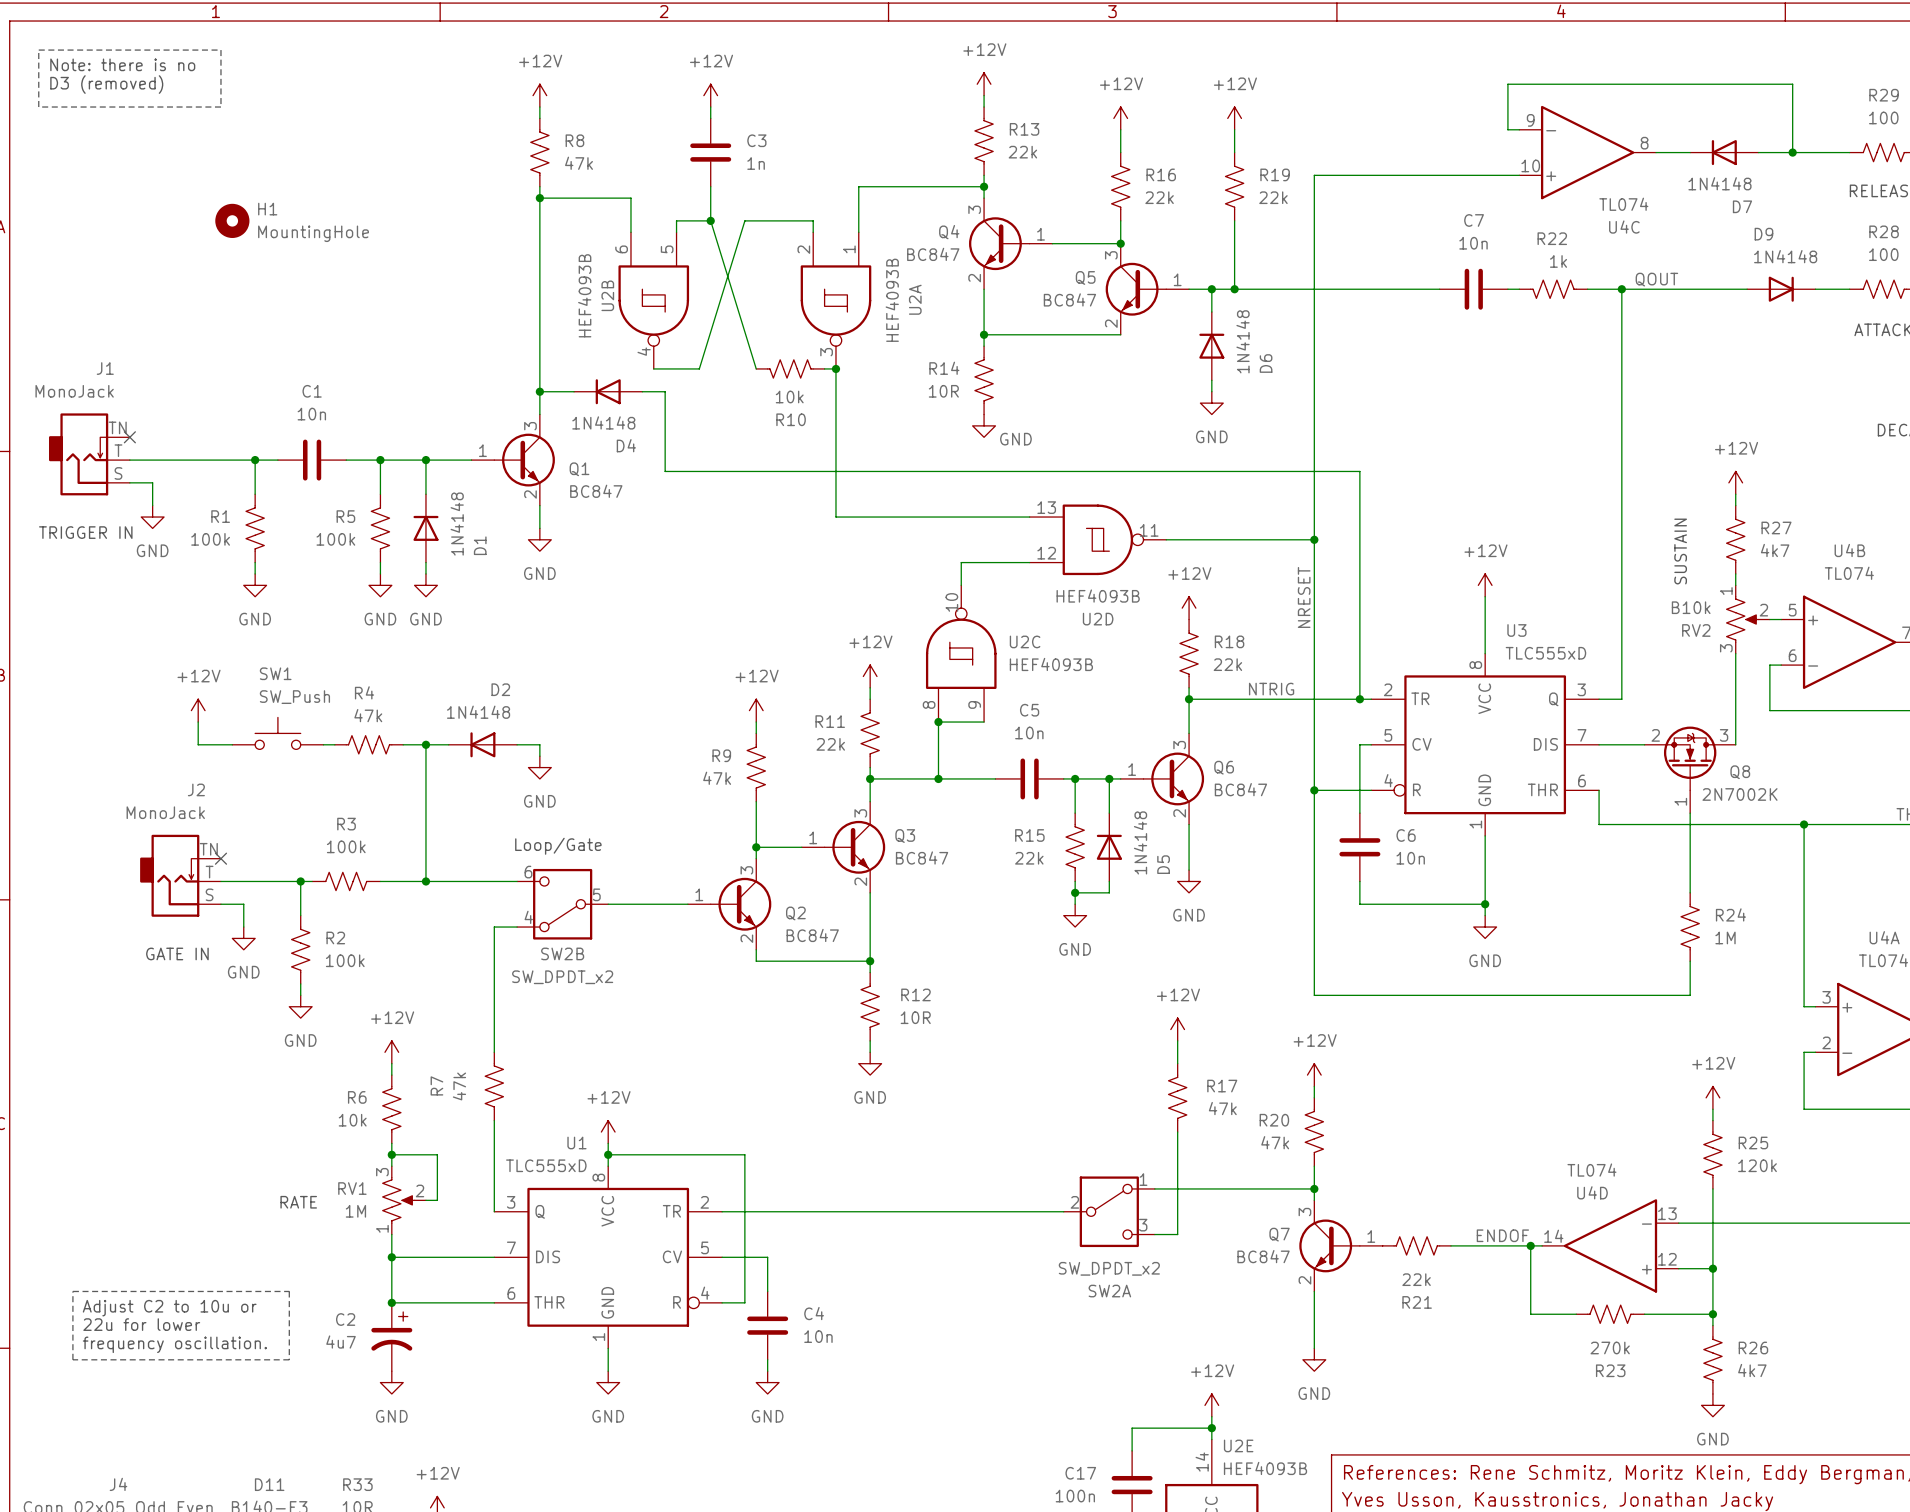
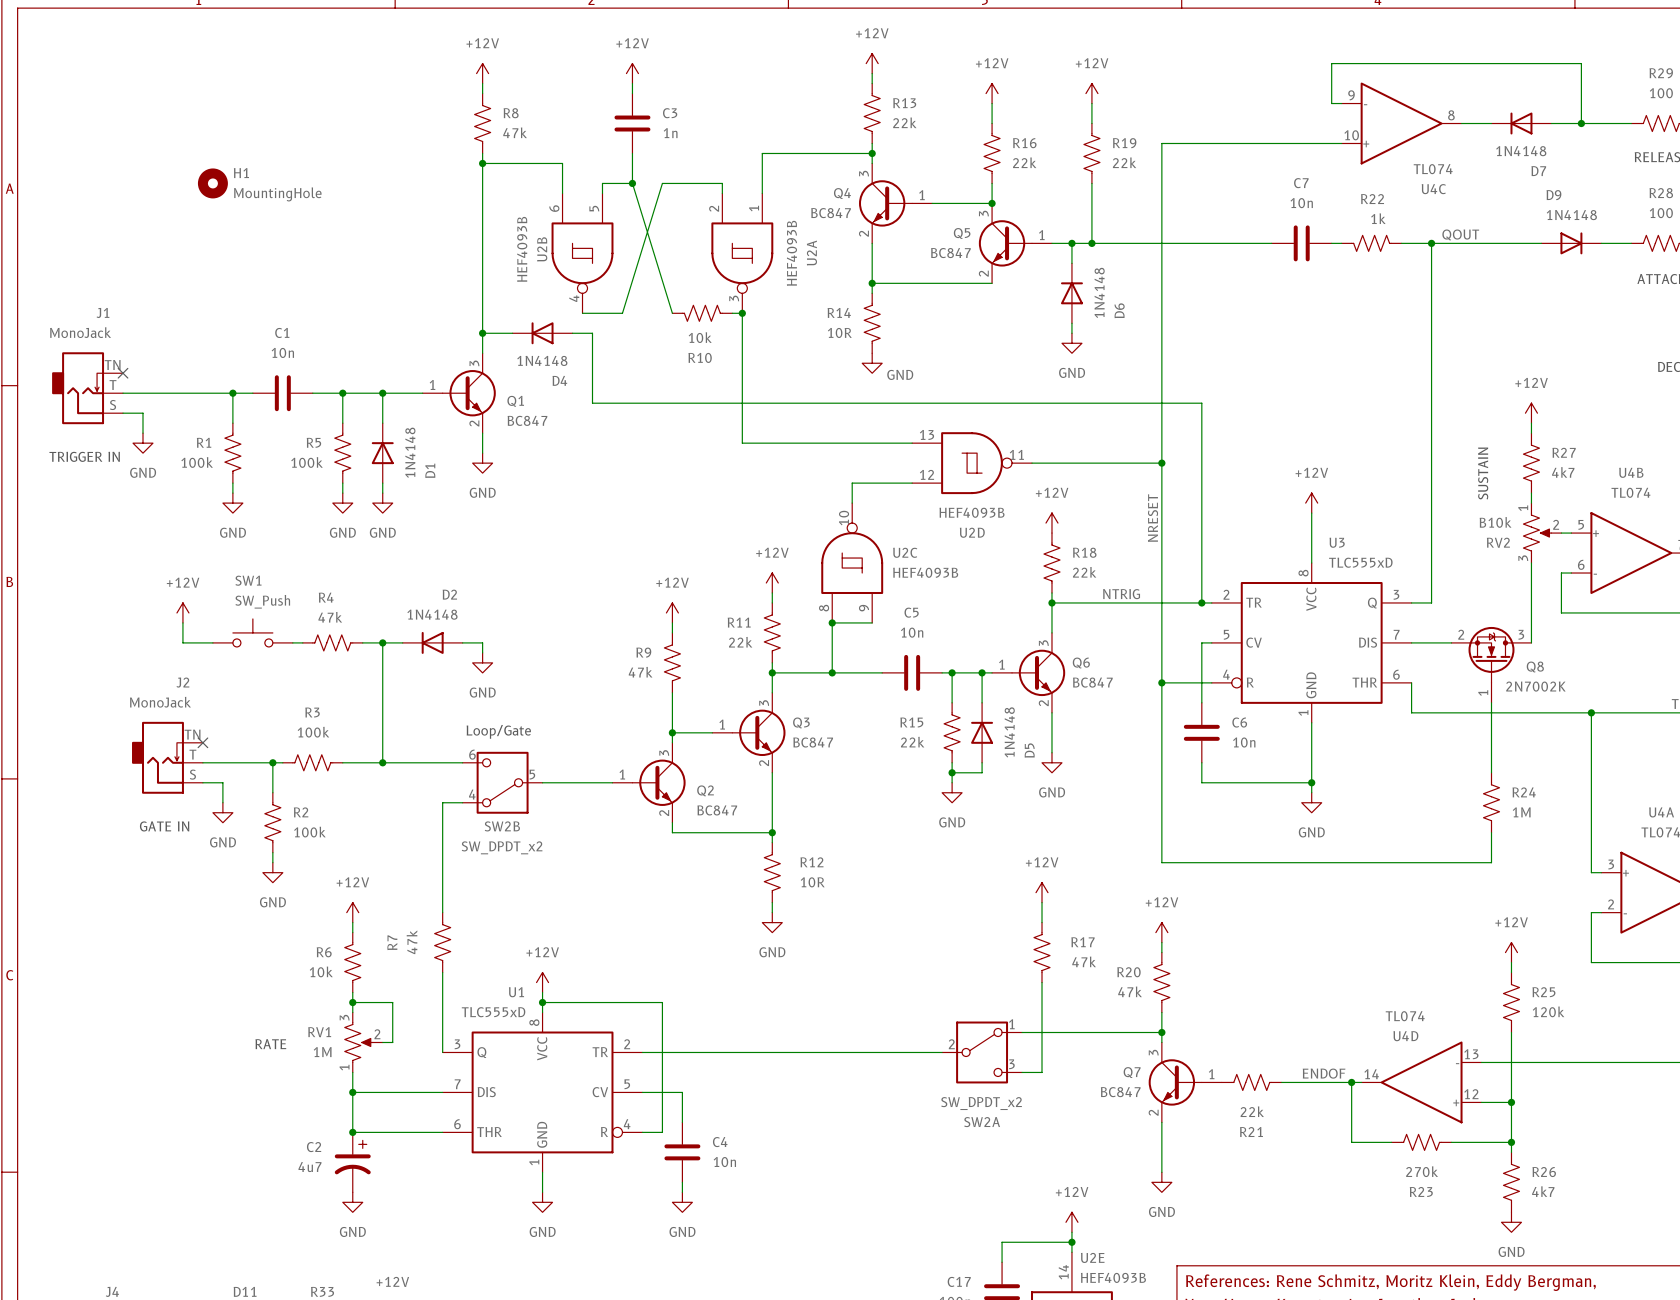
line: (38, 50) (220, 50) (220, 107) (38, 107) (38, 50) -> none
text: Note: there is no (122, 64) -> none
text: D3 (removed) (106, 84) -> none
line: (72, 1291) (289, 1291) (289, 1359) (72, 1359) (72, 1291) -> none
text: Adjust C2 to 10u or (169, 1308) -> none
text: 22u for lower (141, 1324) -> none
text: frequency oscillation. (174, 1344) -> none

